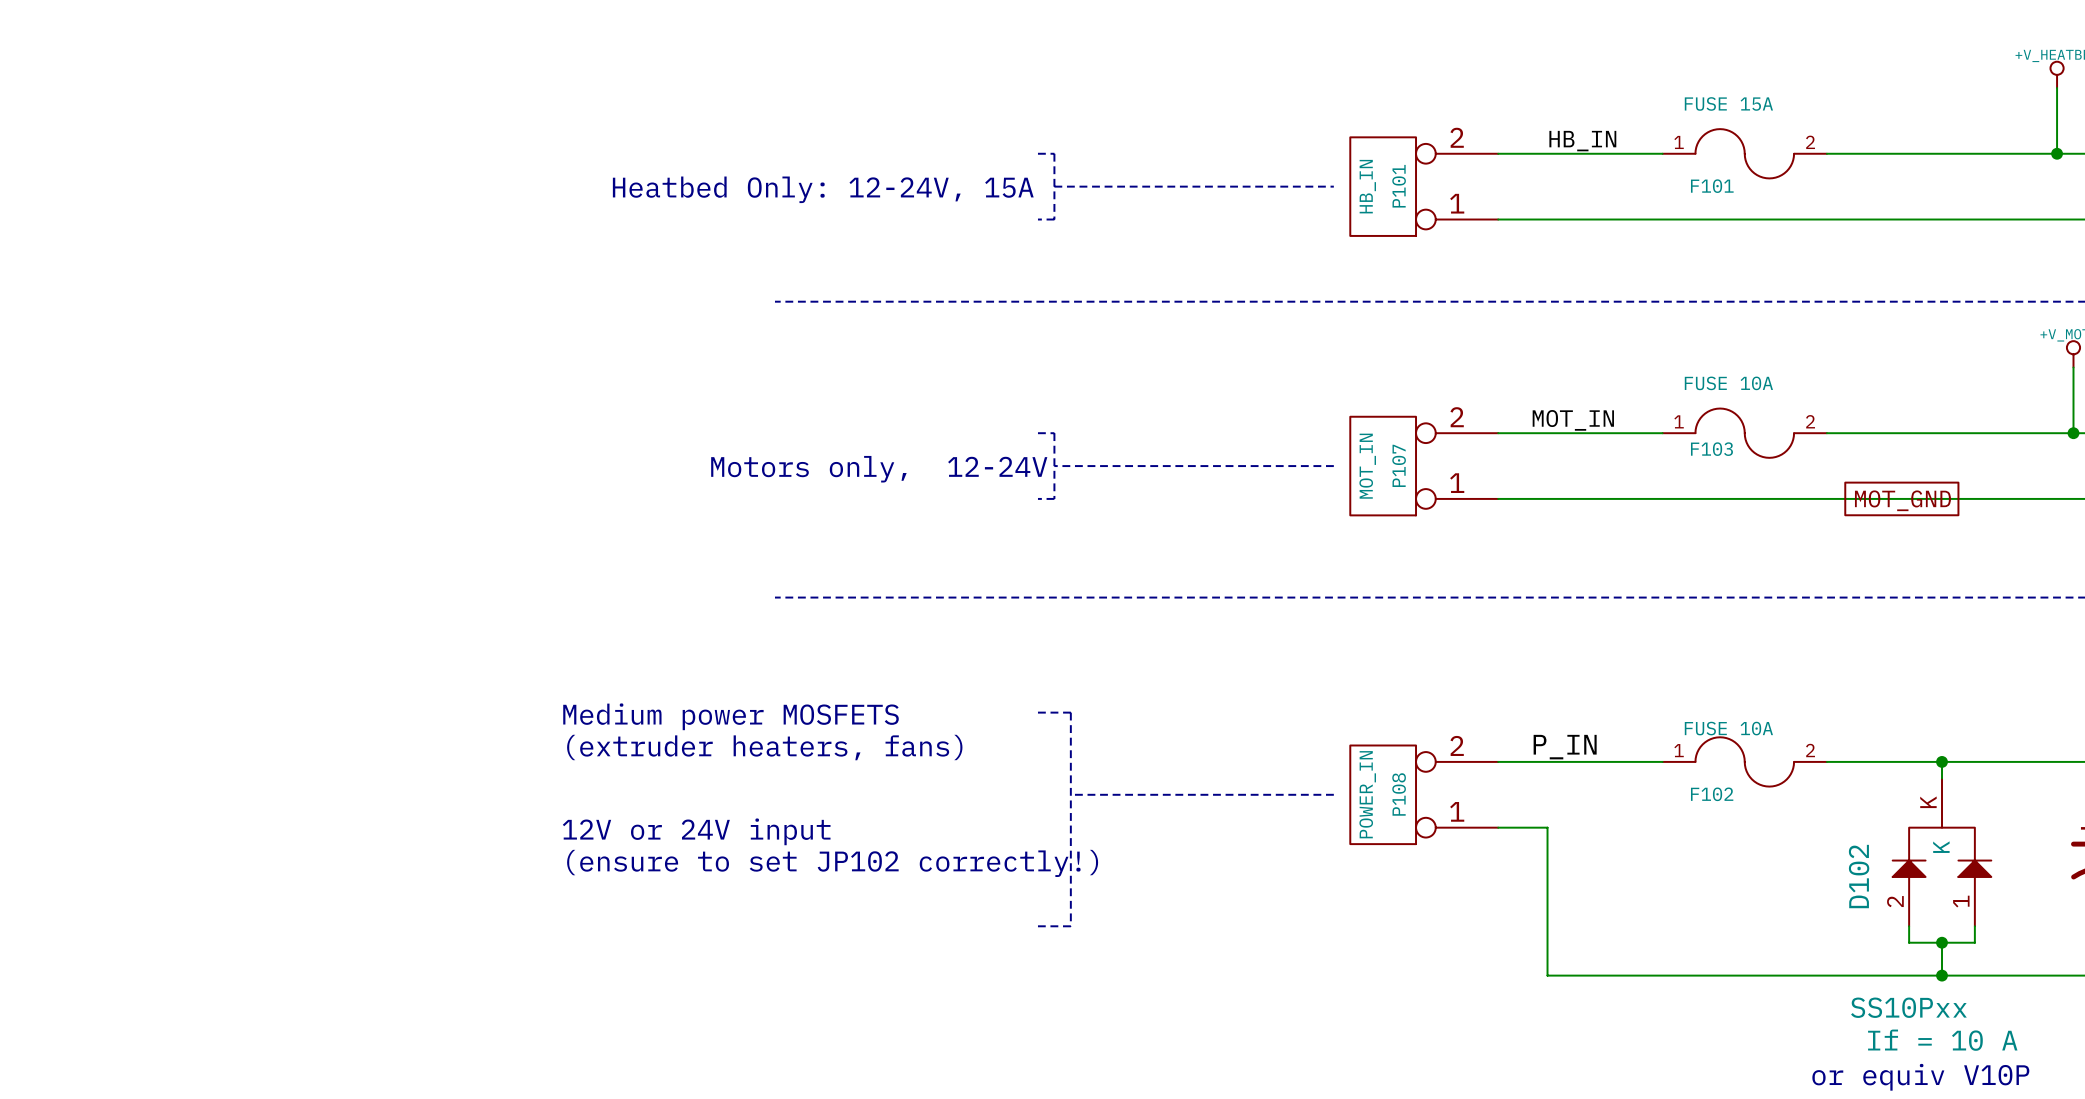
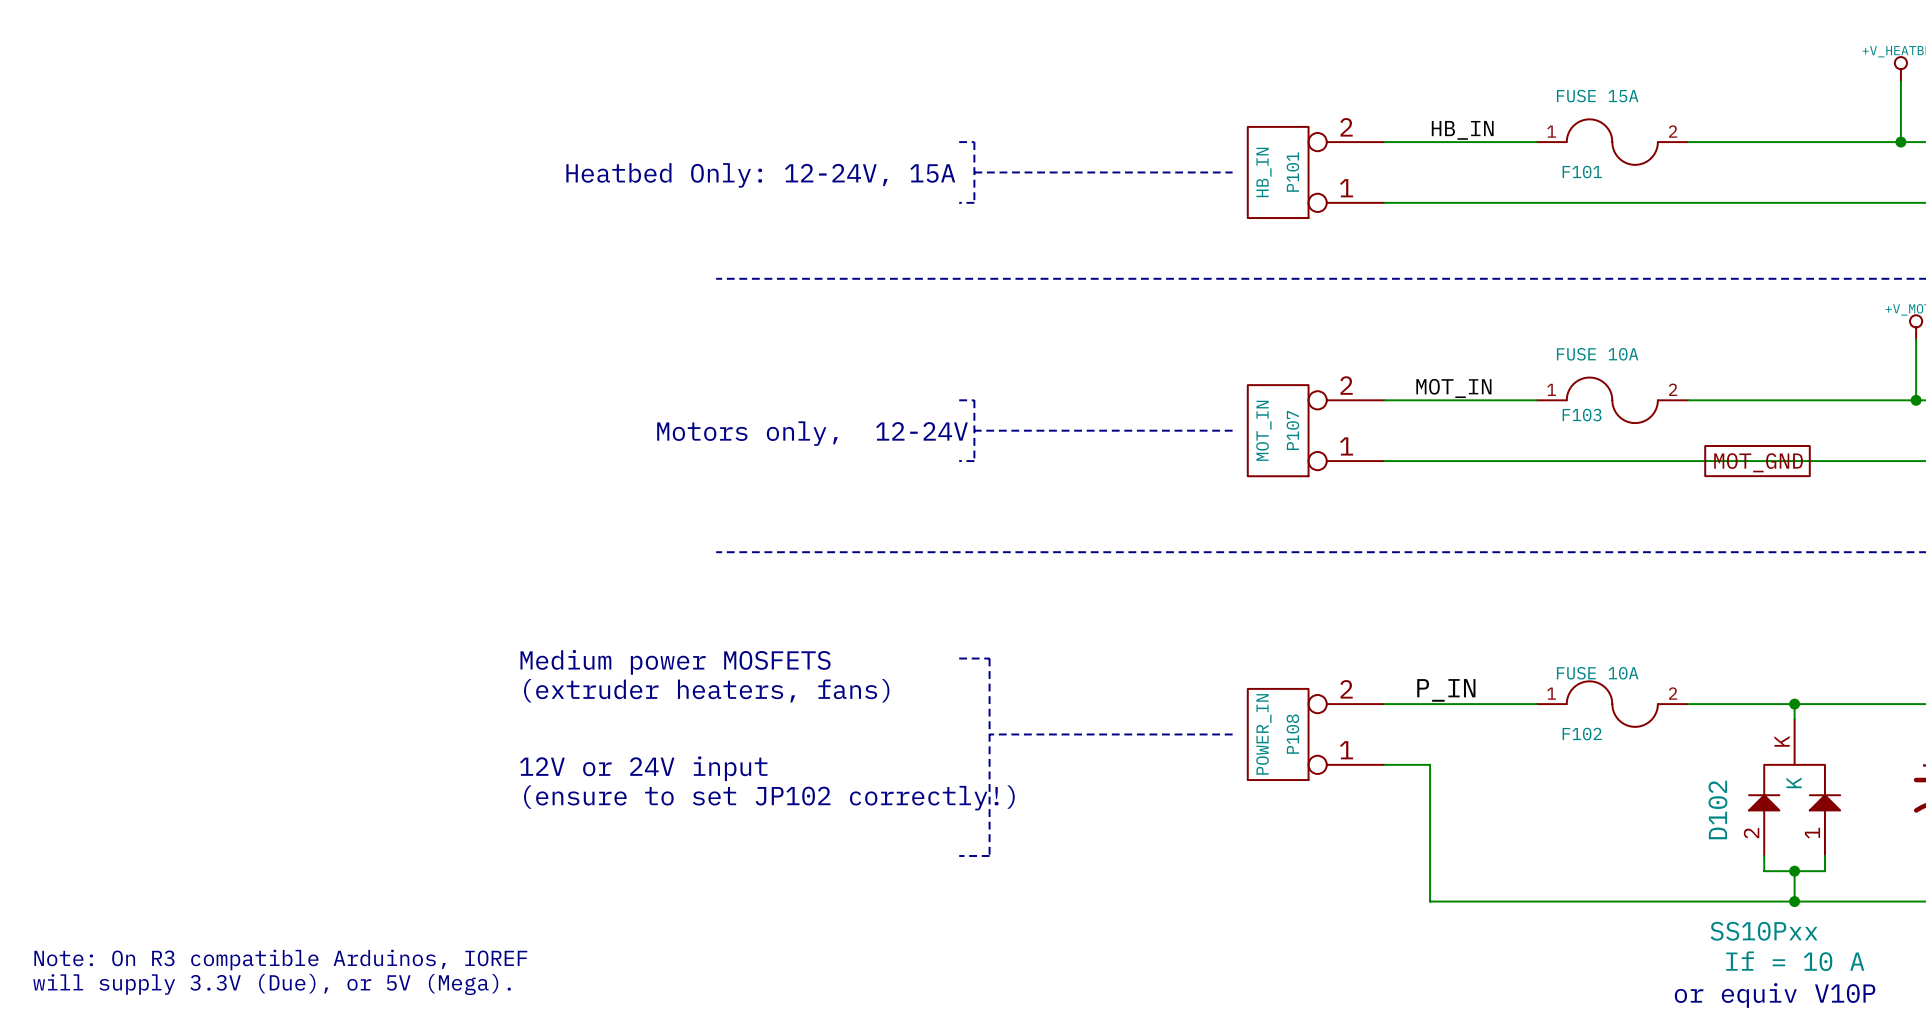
text: none -> Note: On R3 compatible Arduinos, IOREF (280, 960)
text: none -> will supply 3.3V (Due), or 5V (Mega). (272, 984)

